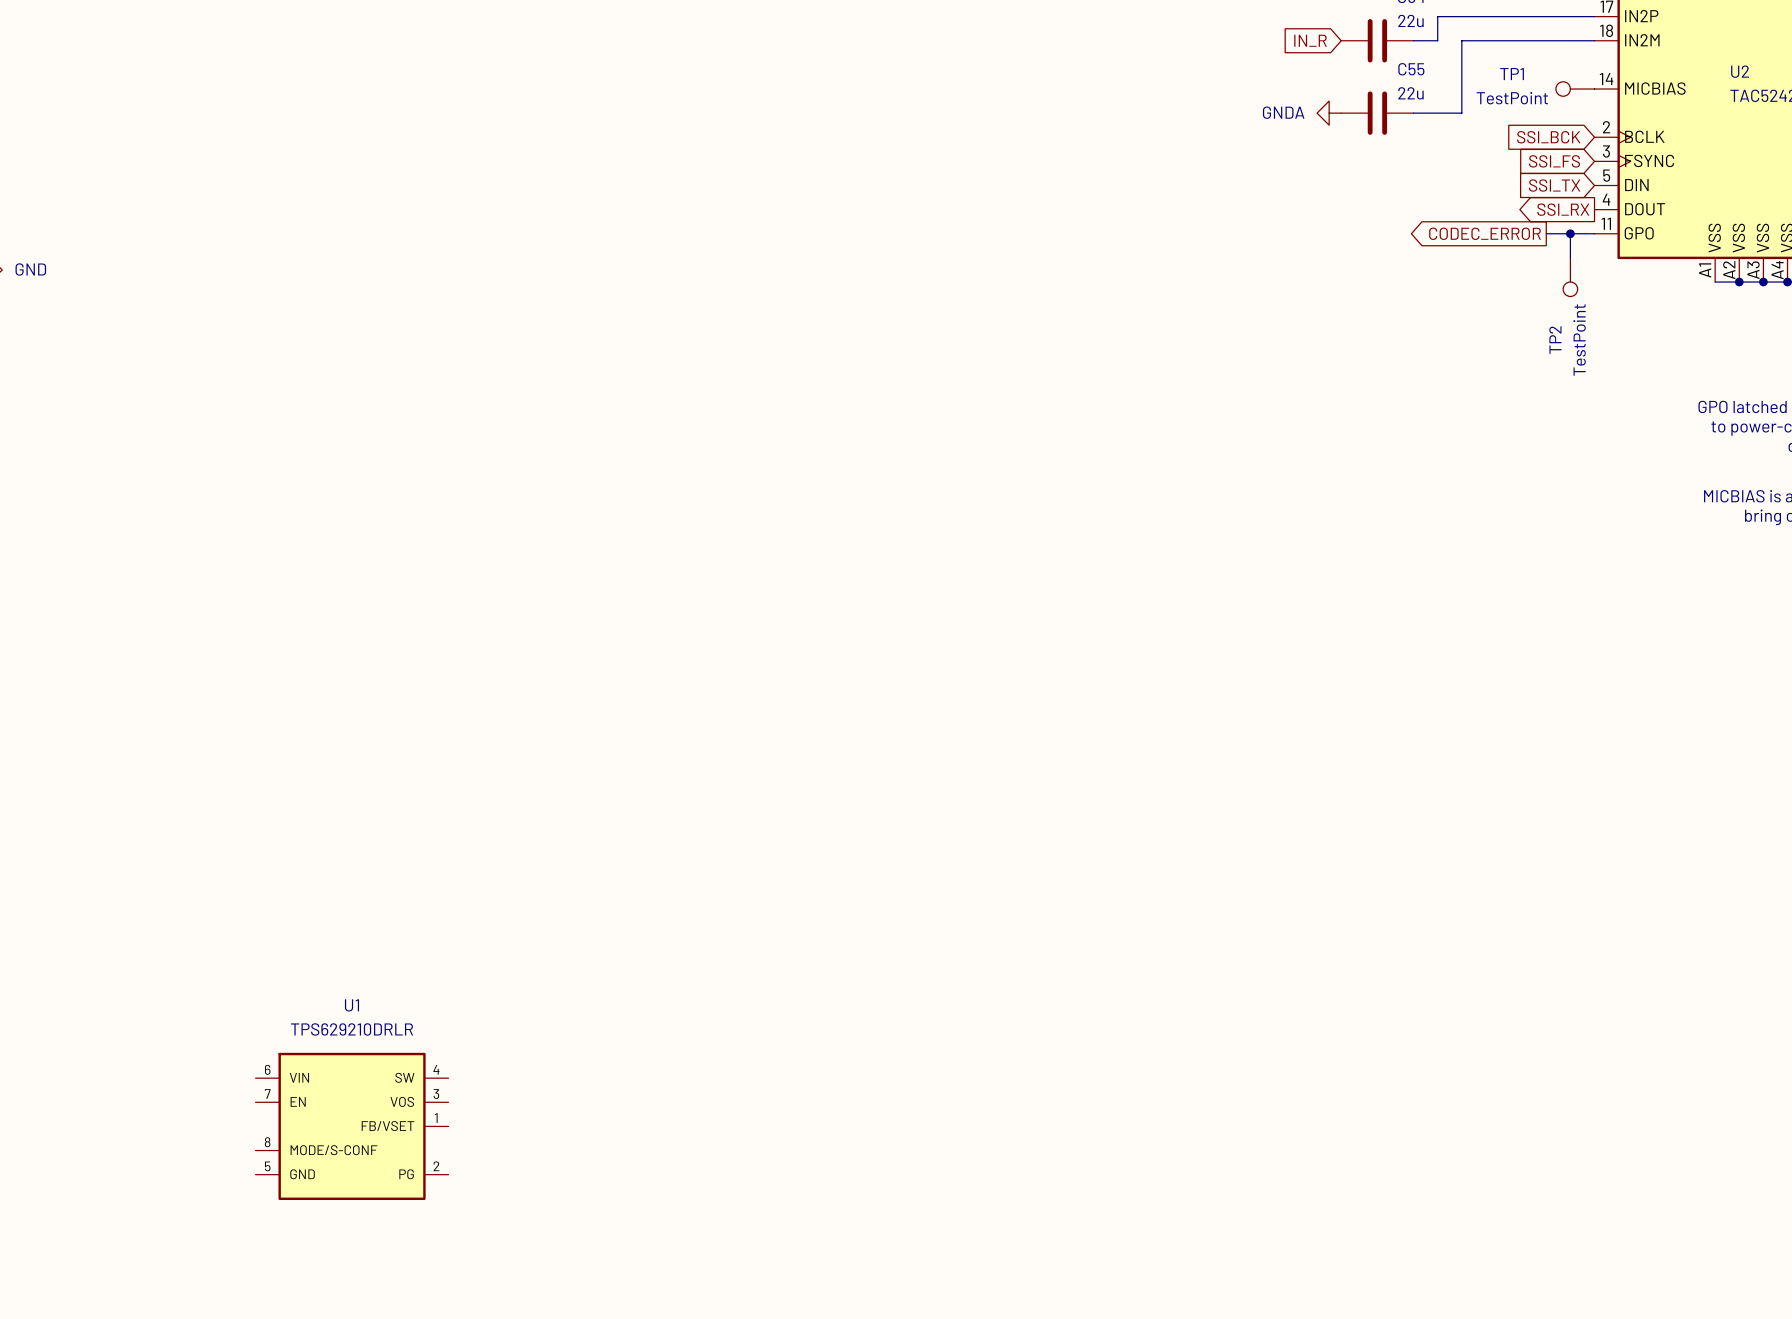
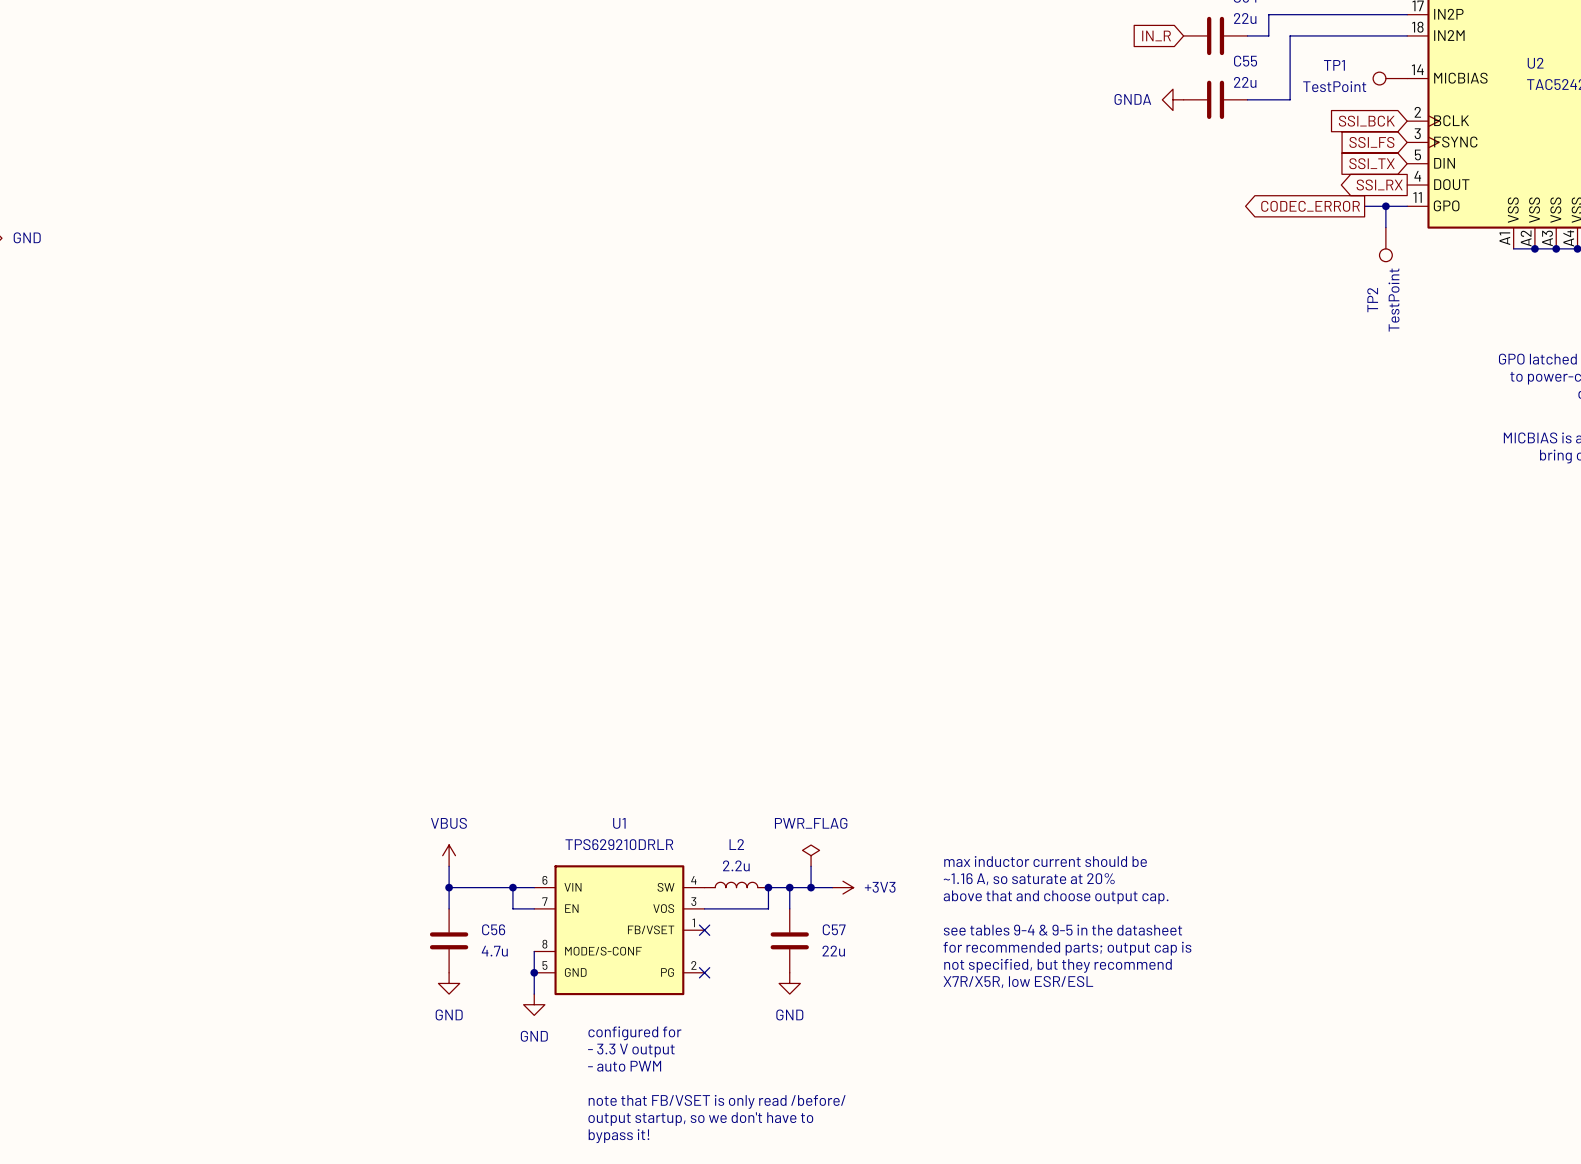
power symbol: none -> VBUS (449, 855)
power symbol: none -> PWR_FLAG (811, 855)
text: none -> max inductor current should be (1045, 861)
wire: none -> (449, 866) (449, 908)
wire: none -> (811, 866) (811, 887)
text: none -> ~1.16 A, so saturate at 20% (1029, 879)
L2: none -> 2.2u (736, 884)
wire: none -> (449, 887) (534, 887)
junction: none -> (449, 887)
wire: none -> (512, 887) (512, 908) (534, 908)
junction: none -> (512, 887)
junction: none -> (768, 887)
wire: none -> (789, 887) (789, 908)
junction: none -> (789, 887)
junction: none -> (811, 887)
wire: none -> (832, 887) (768, 887) (768, 908) (704, 908)
power symbol: none -> +3V3 (842, 887)
text: none -> above that and choose output cap. (1056, 897)
text: none -> see tables 9-4 & 9-5 in the datasheet (1063, 930)
no-connect mark: none -> (704, 930)
C56: none -> 4.7u (449, 940)
C57: none -> 22u (789, 940)
text: none -> for recommended parts; output cap is (1067, 948)
wire: none -> (534, 951) (534, 994)
text: none -> not specified, but they recommend (1058, 965)
junction: none -> (534, 972)
no-connect mark: none -> (704, 972)
text: none -> X7R/X5R, low ESR/ESL (1018, 982)
power symbol: none -> GND (449, 983)
power symbol: none -> GND (789, 983)
U1 position: (352, 1126) -> (619, 930)
power symbol: none -> GND (534, 1004)
text: none -> configured for (634, 1033)
text: none -> - 3.3 V output (631, 1050)
text: none -> - auto PWM (624, 1066)
text: none -> note that FB/VSET is only read /before/ (717, 1101)
text: none -> output startup, so we don't have to (700, 1119)
text: none -> bypass it! (618, 1136)

